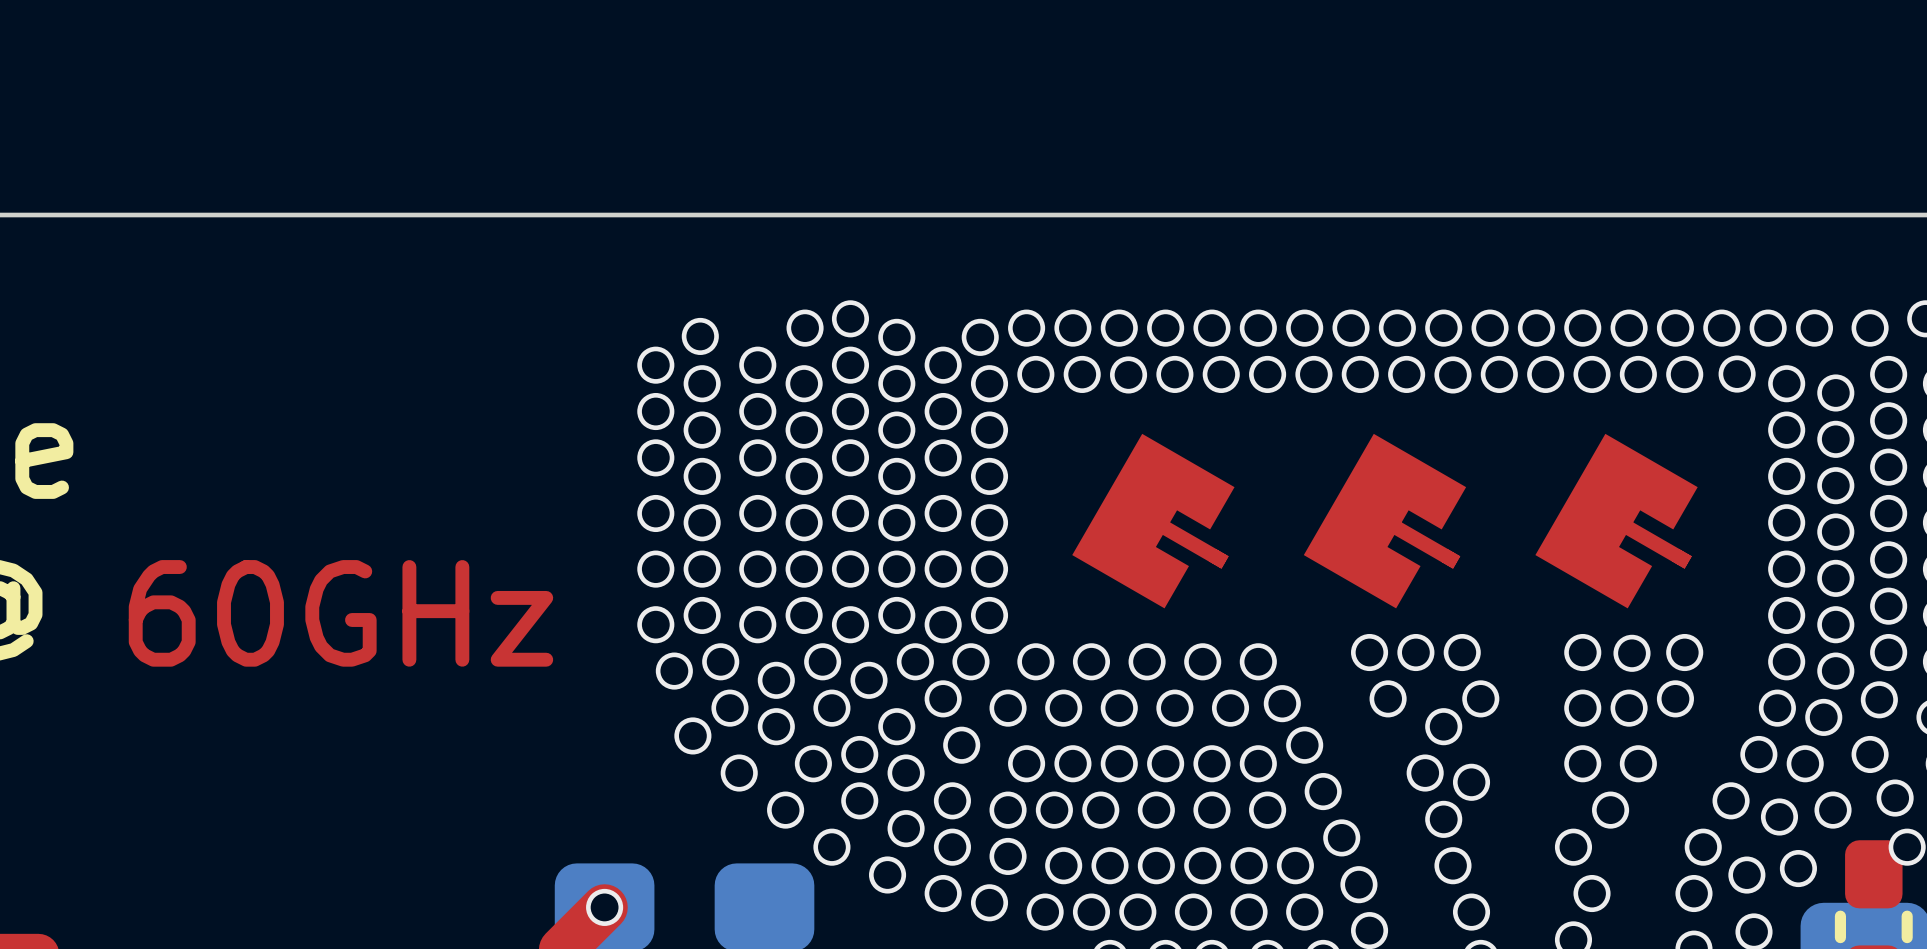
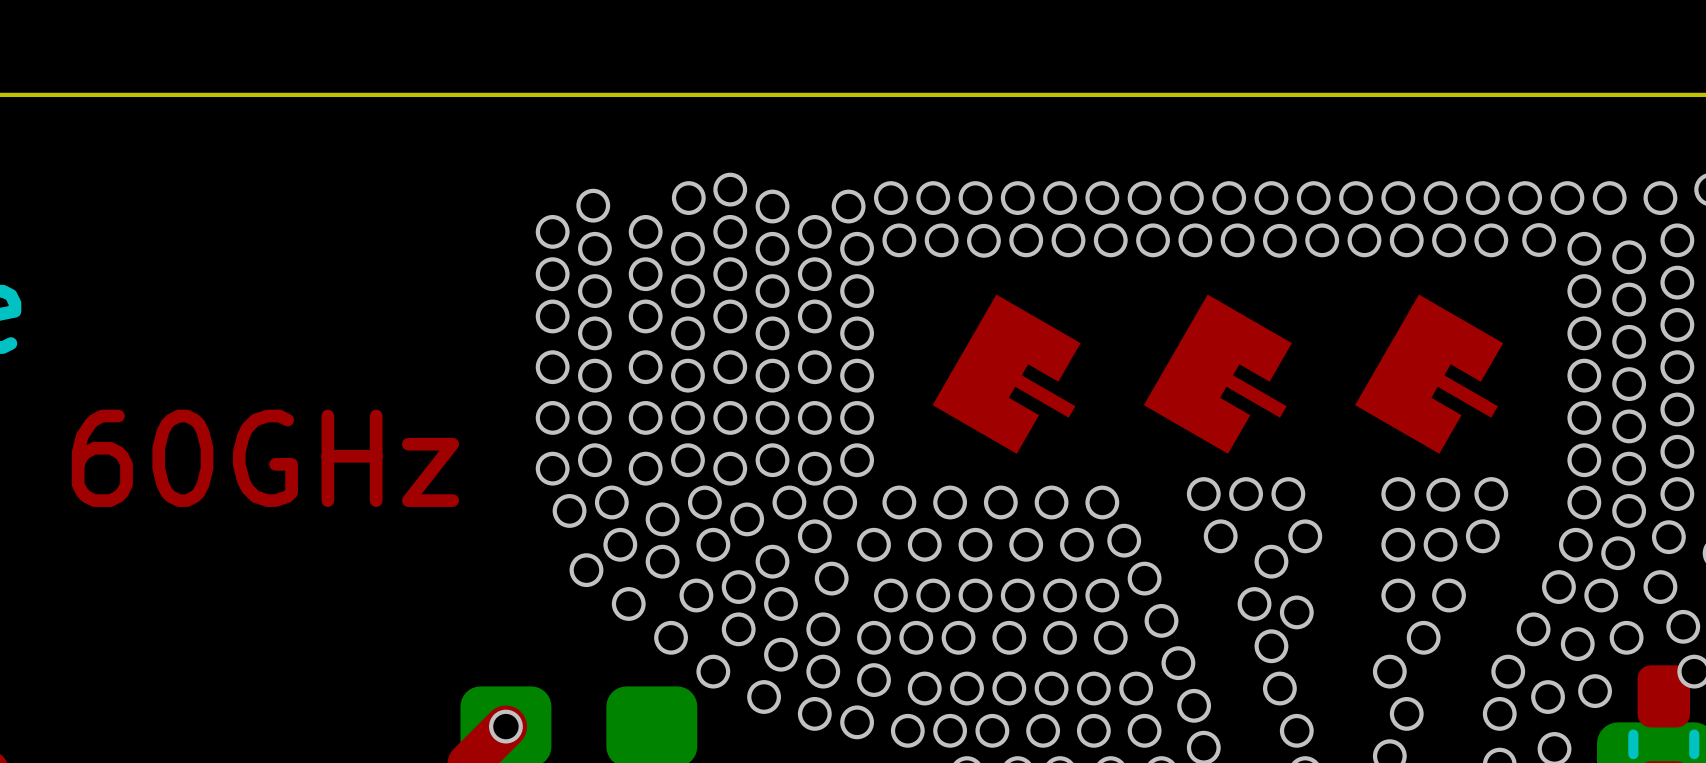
part footprint: [1072, 433, 1698, 609] -> [932, 294, 1504, 454]

